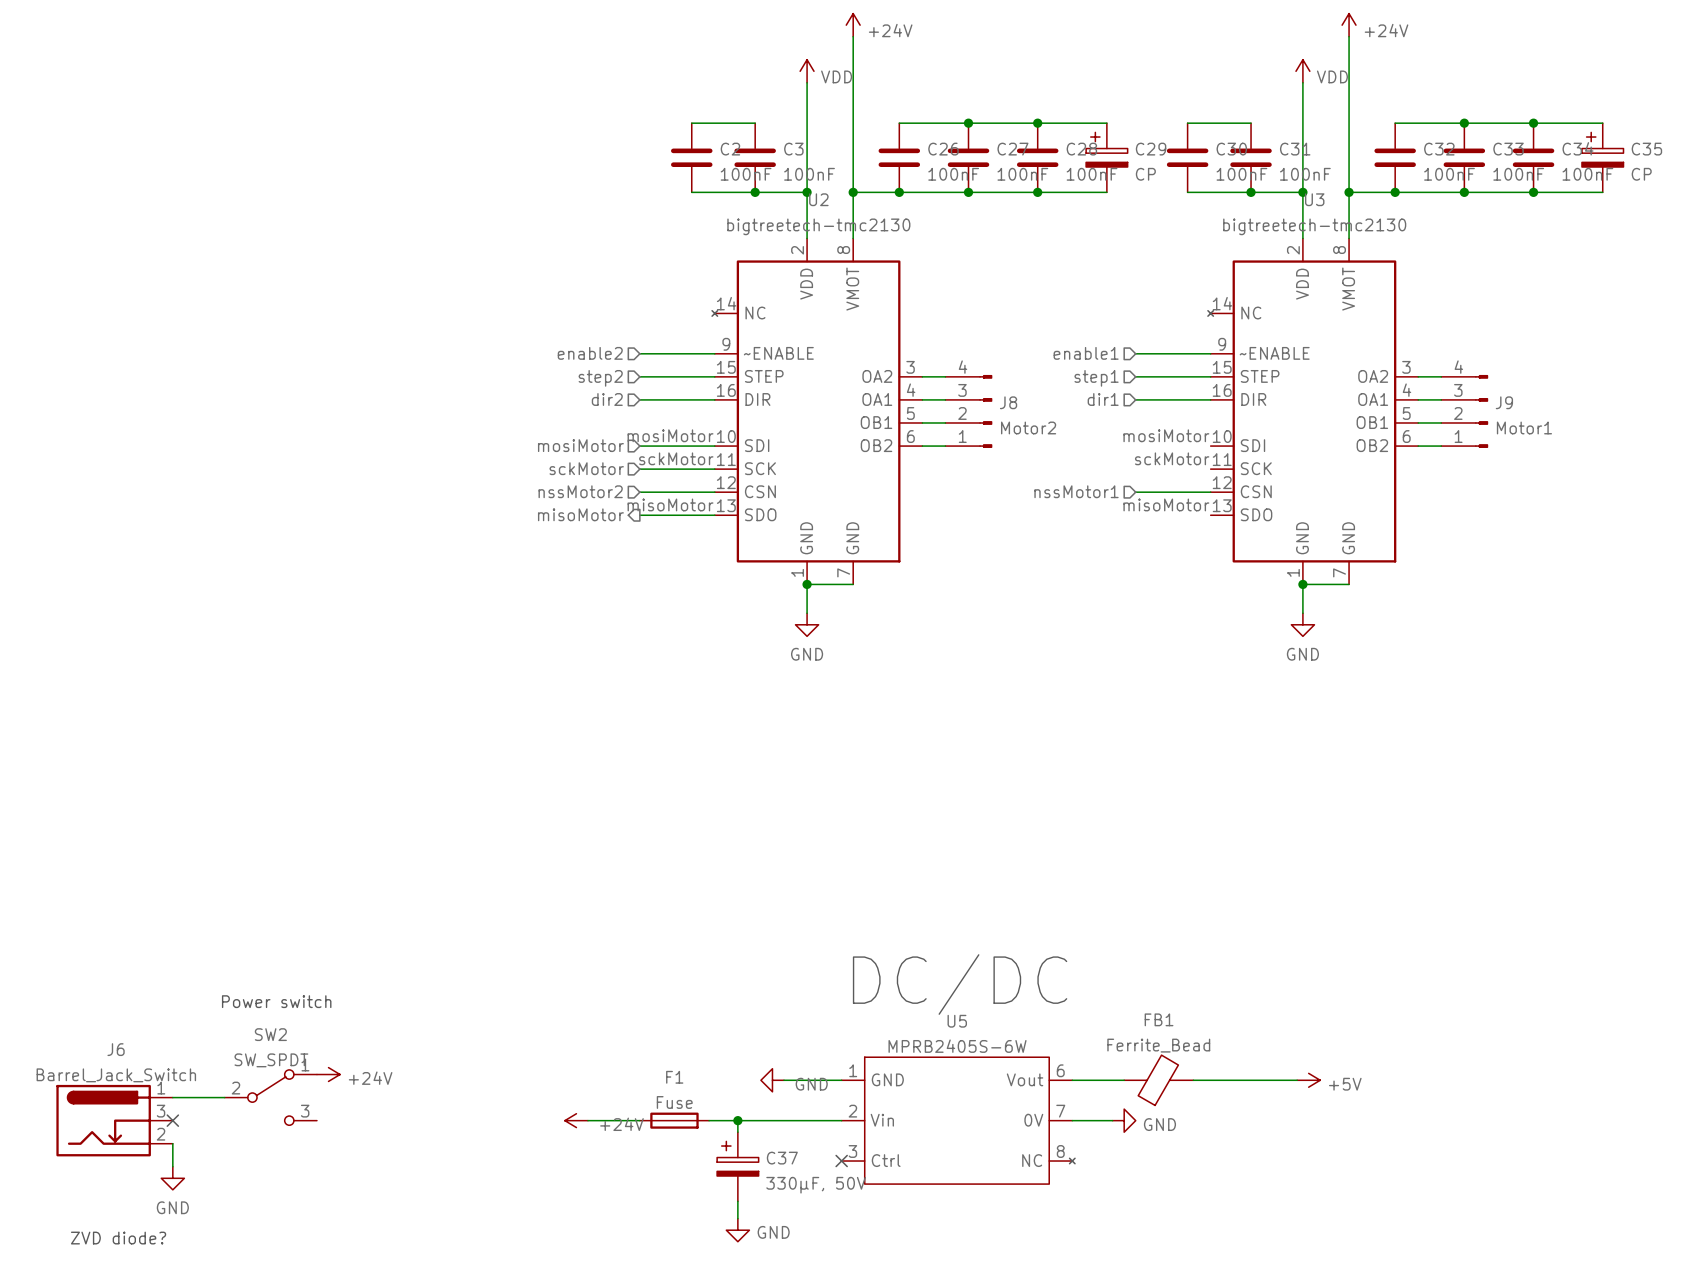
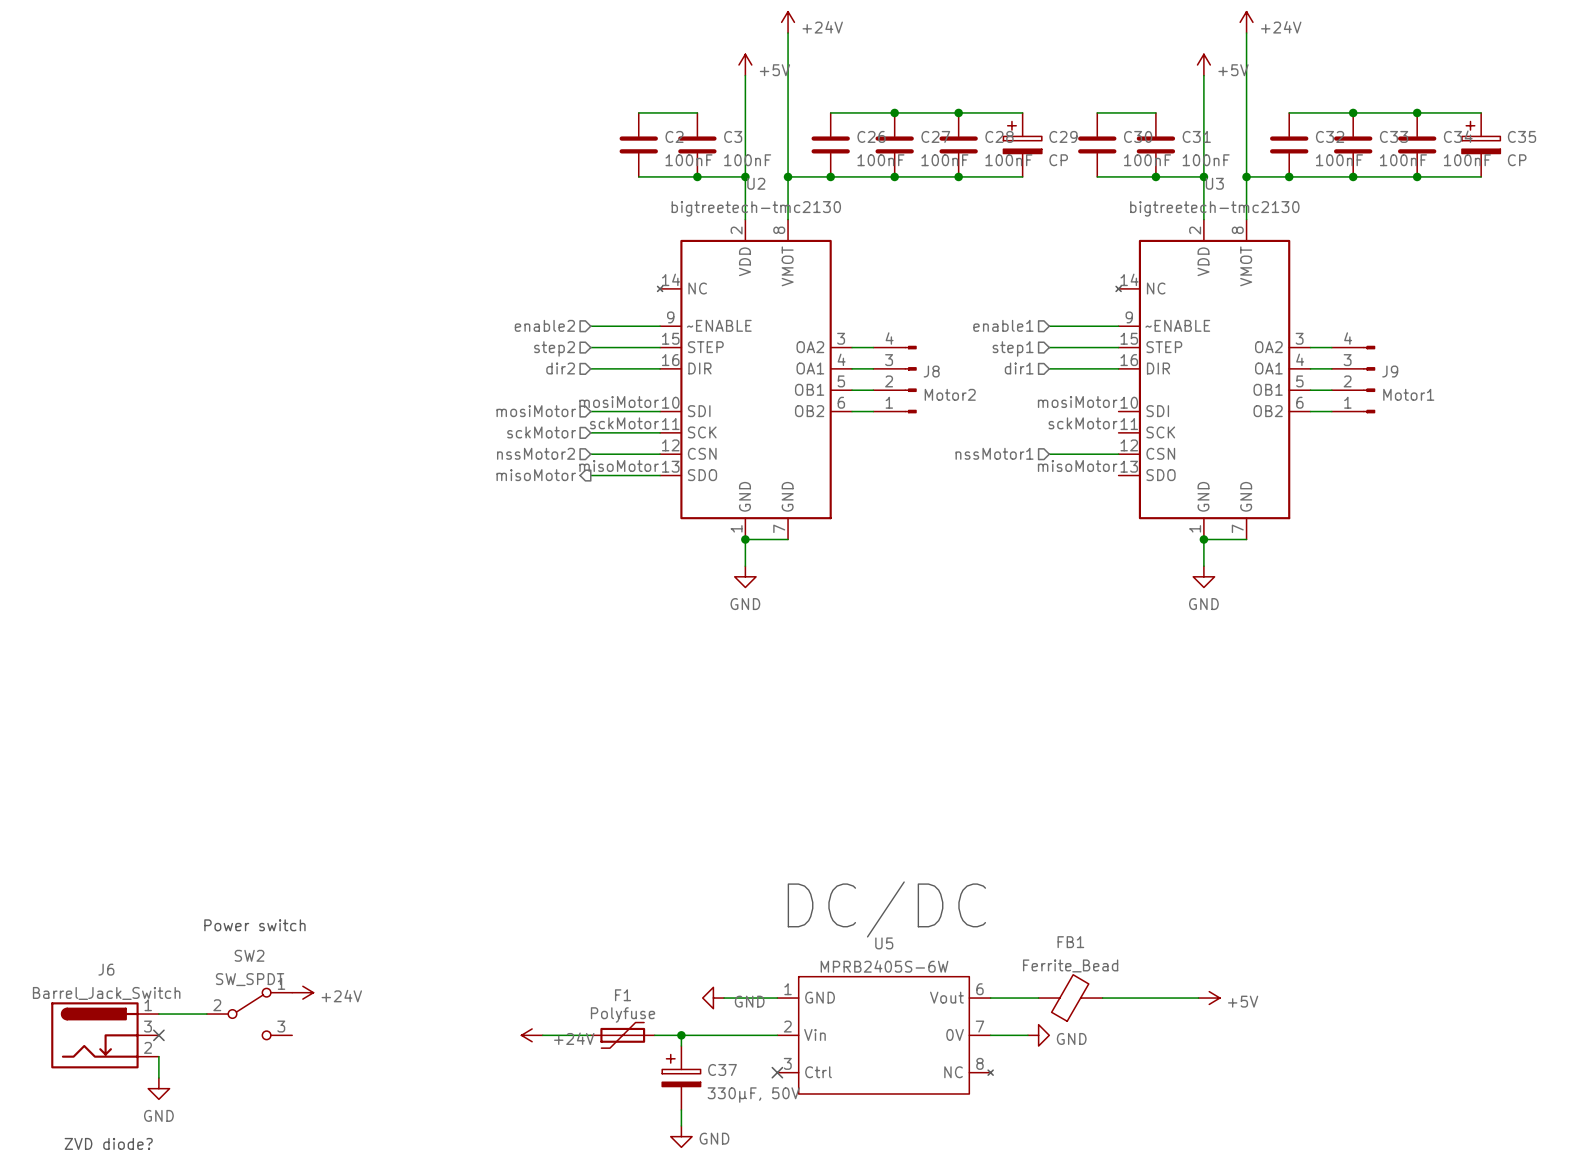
power symbol: VDD (807, 71) -> +5V (745, 64)
power symbol: VDD (1302, 71) -> +5V (1203, 64)
F1 value: Fuse (674, 1102) -> Polyfuse (623, 1014)
F1 symbol: [639, 1112, 710, 1129] -> [590, 1022, 655, 1049]

